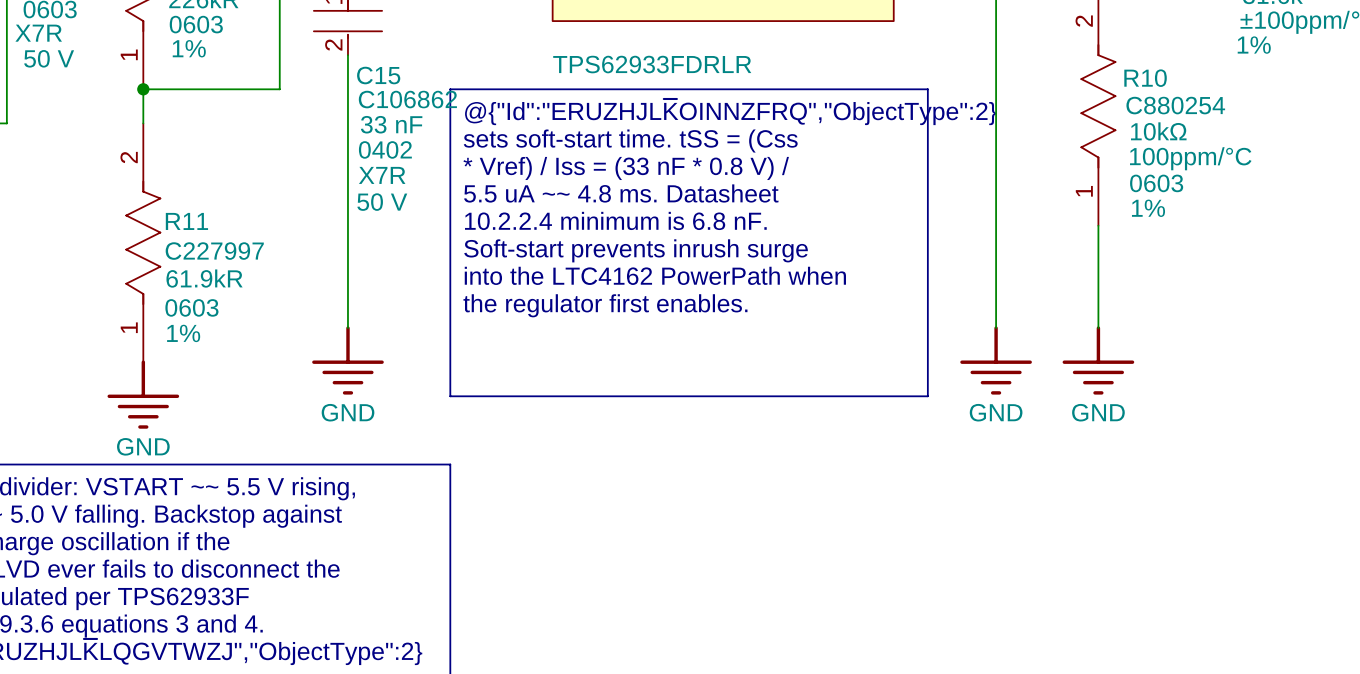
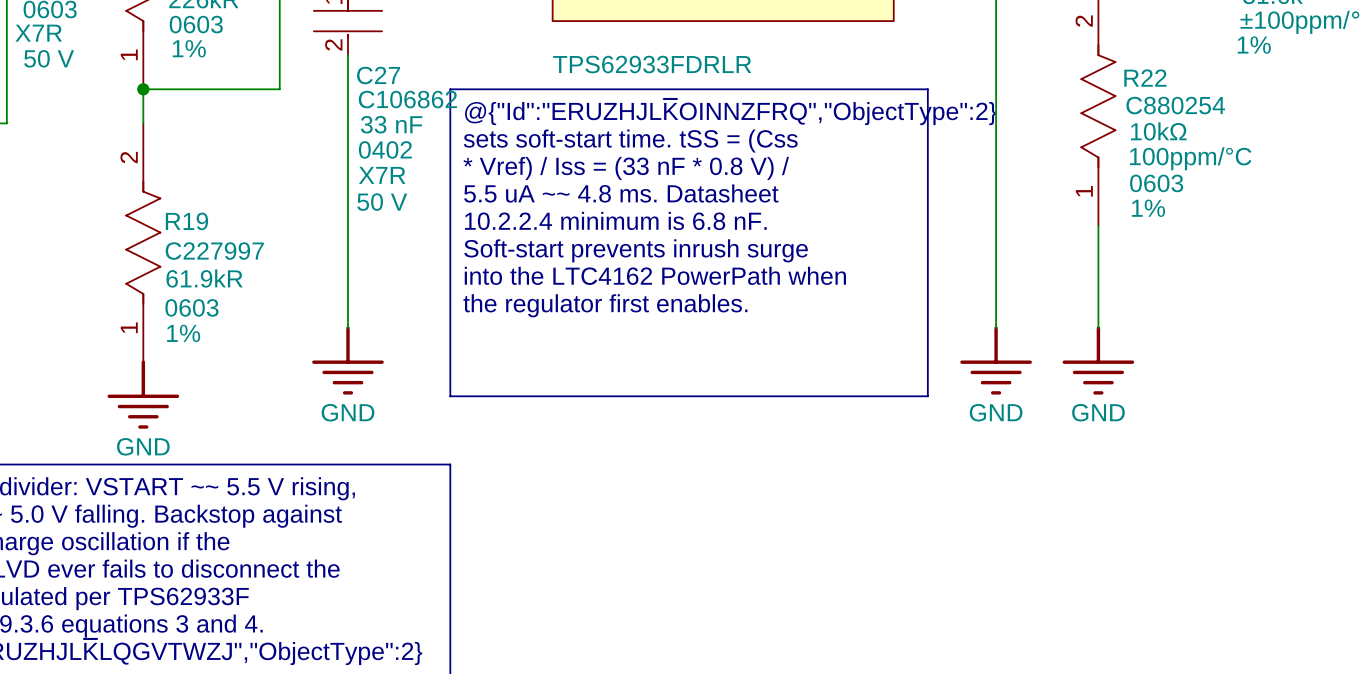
C15 name: C15 (378, 75) -> C27 (378, 75)
R10 name: R10 (1145, 78) -> R22 (1145, 78)
R11 name: R11 (186, 221) -> R19 (186, 221)

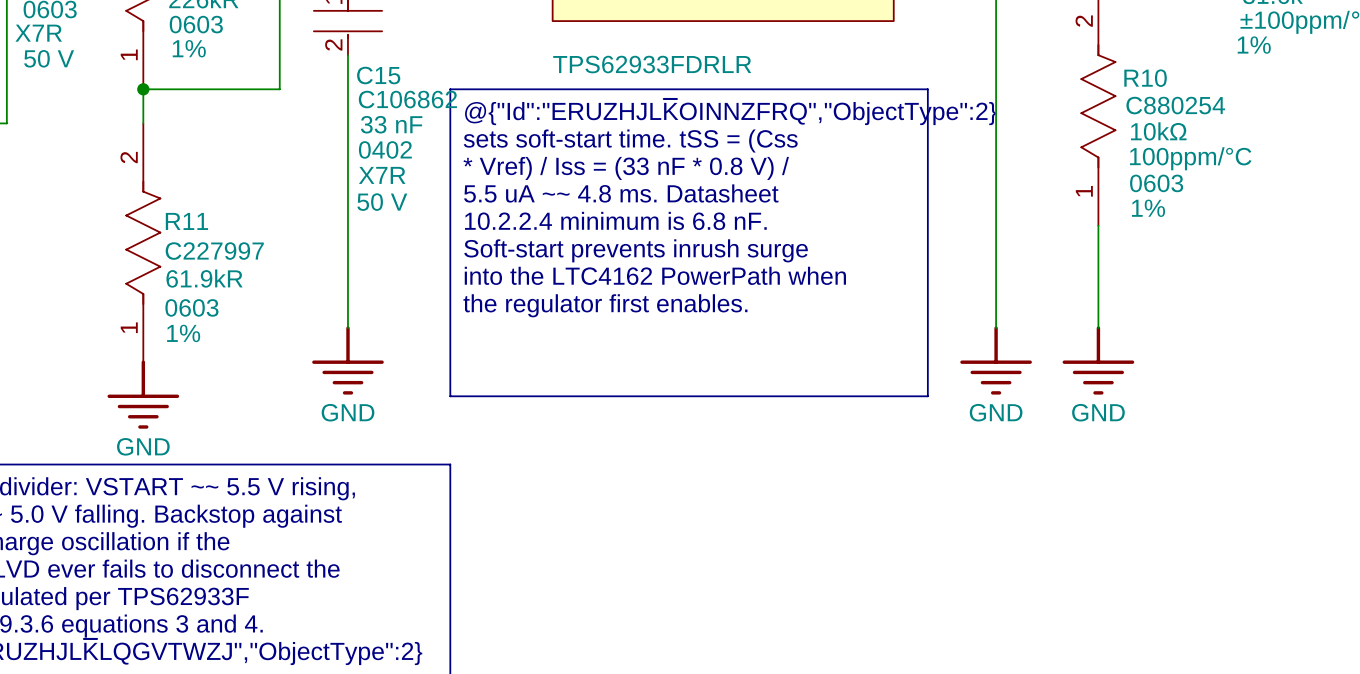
C27 name: C27 (378, 75) -> C15 (378, 75)
R22 name: R22 (1145, 78) -> R10 (1145, 78)
R19 name: R19 (186, 221) -> R11 (186, 221)

